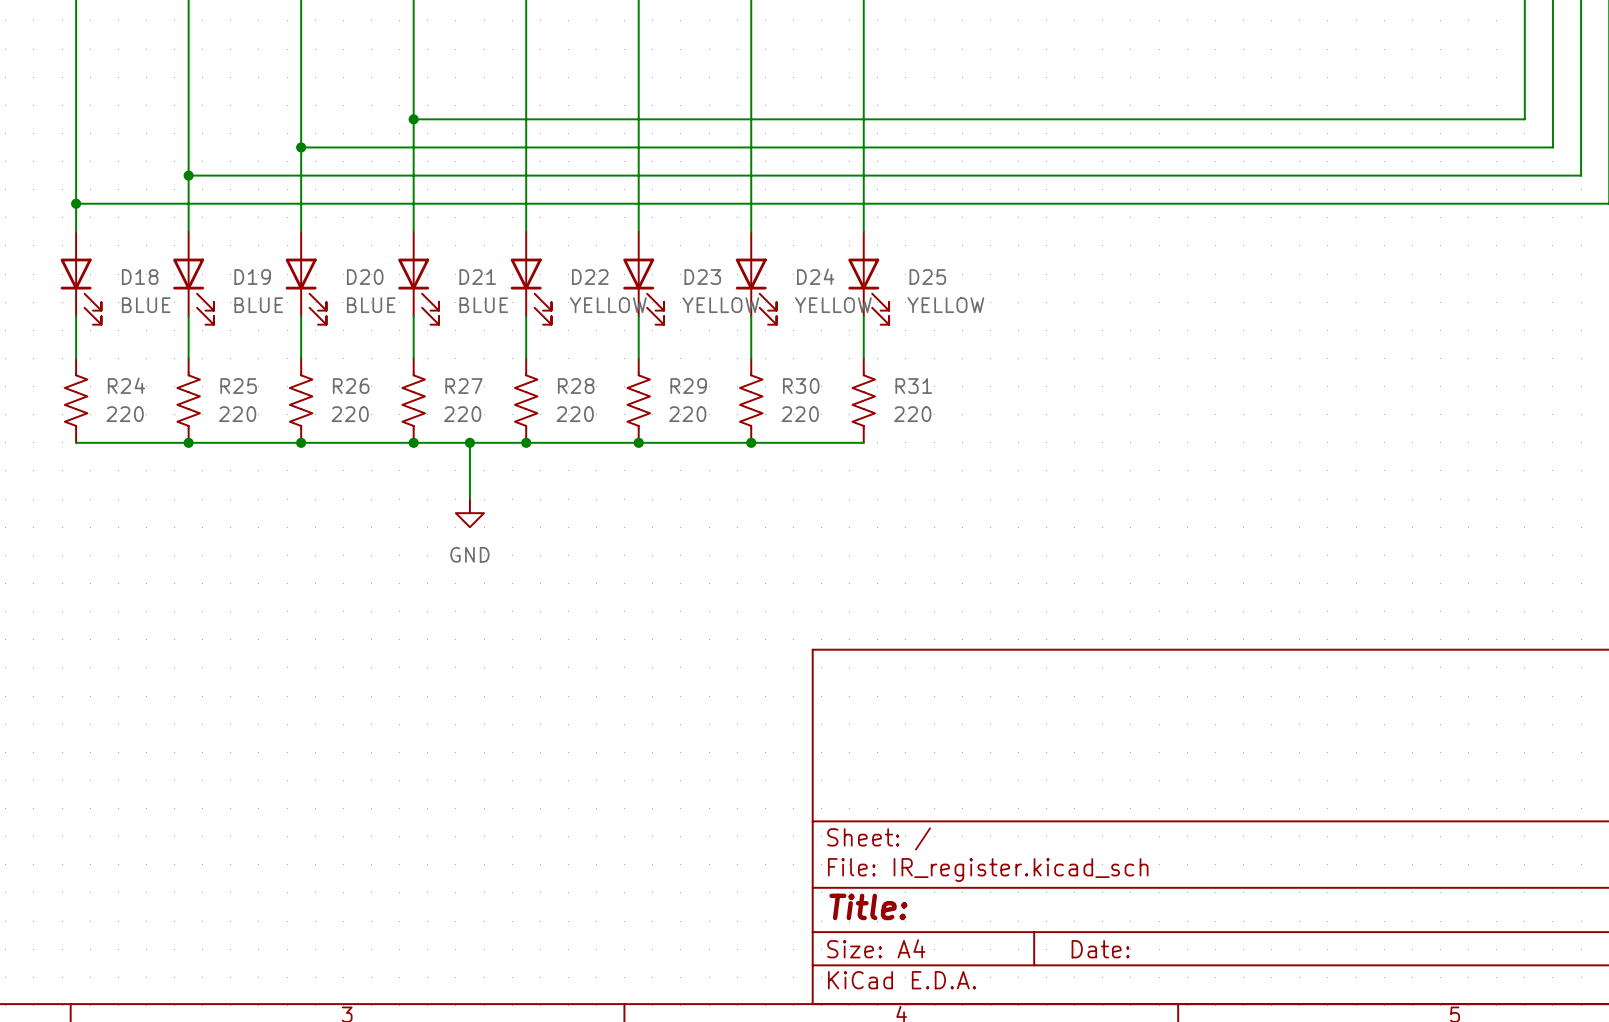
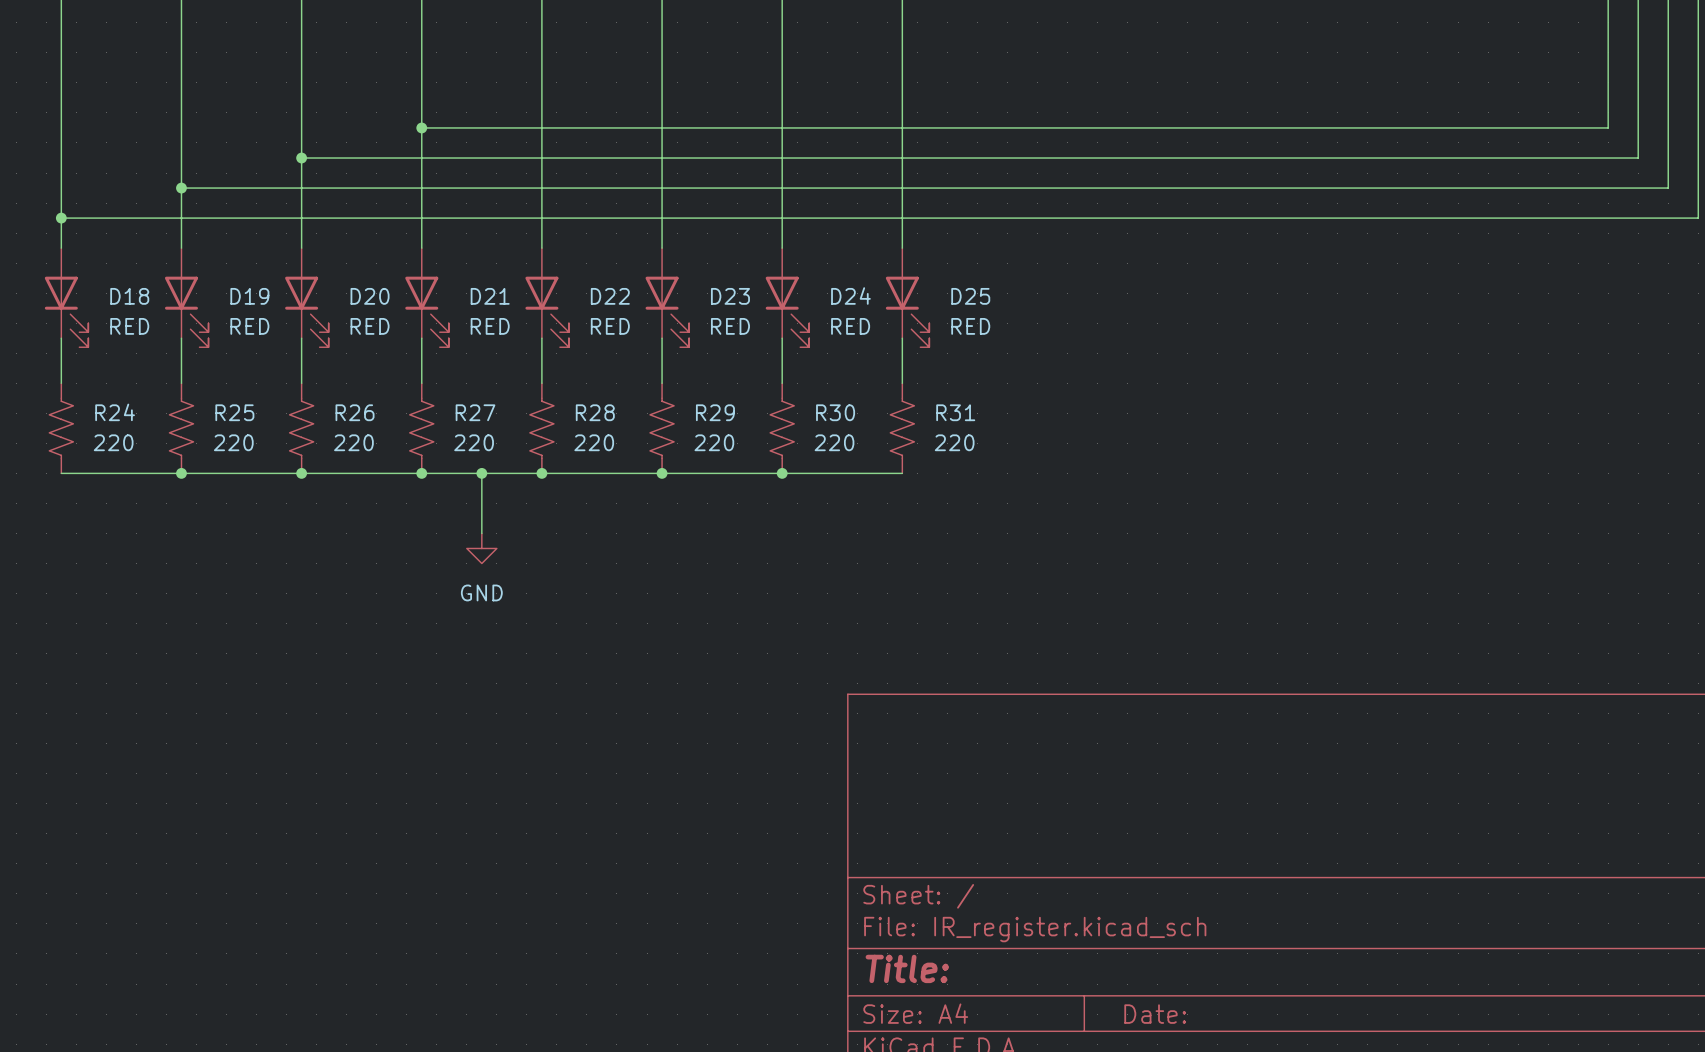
D18 value: BLUE (146, 305) -> RED (129, 326)
D19 value: BLUE (258, 305) -> RED (249, 326)
D20 value: BLUE (371, 305) -> RED (370, 326)
D21 value: BLUE (483, 305) -> RED (490, 326)
D22 value: YELLOW (608, 305) -> RED (610, 326)
D23 value: YELLOW (720, 305) -> RED (730, 326)
D24 value: YELLOW (833, 305) -> RED (850, 326)
D25 value: YELLOW (945, 305) -> RED (970, 326)

